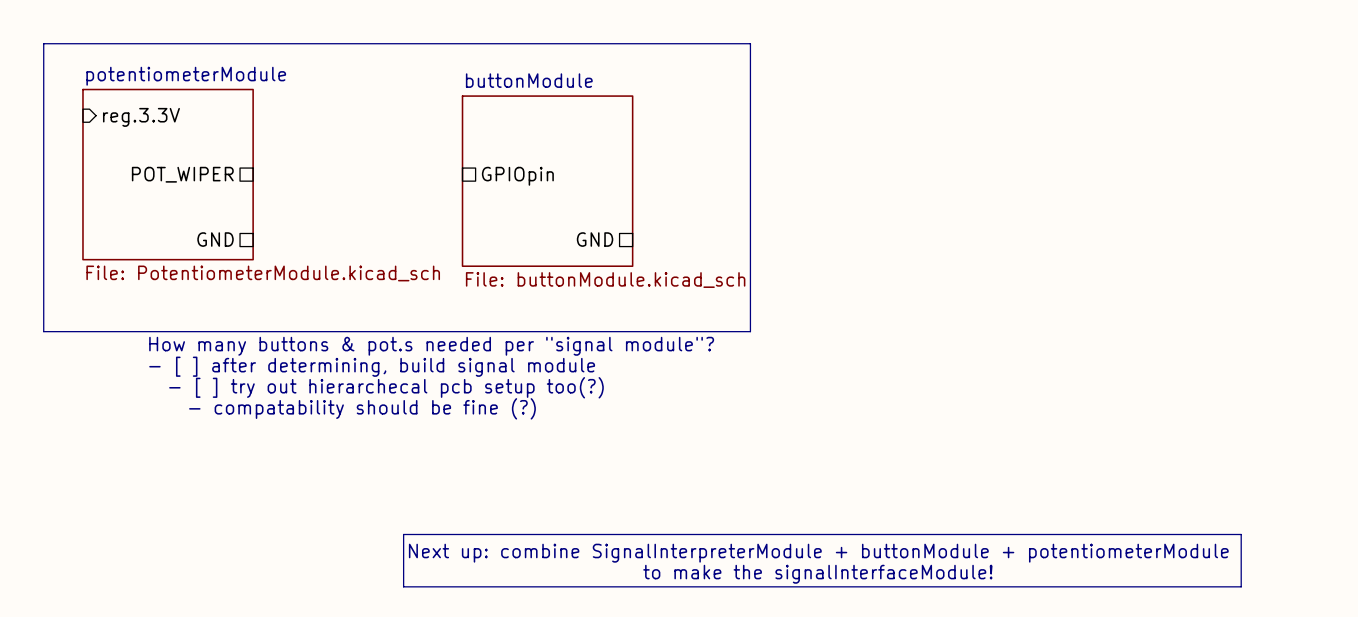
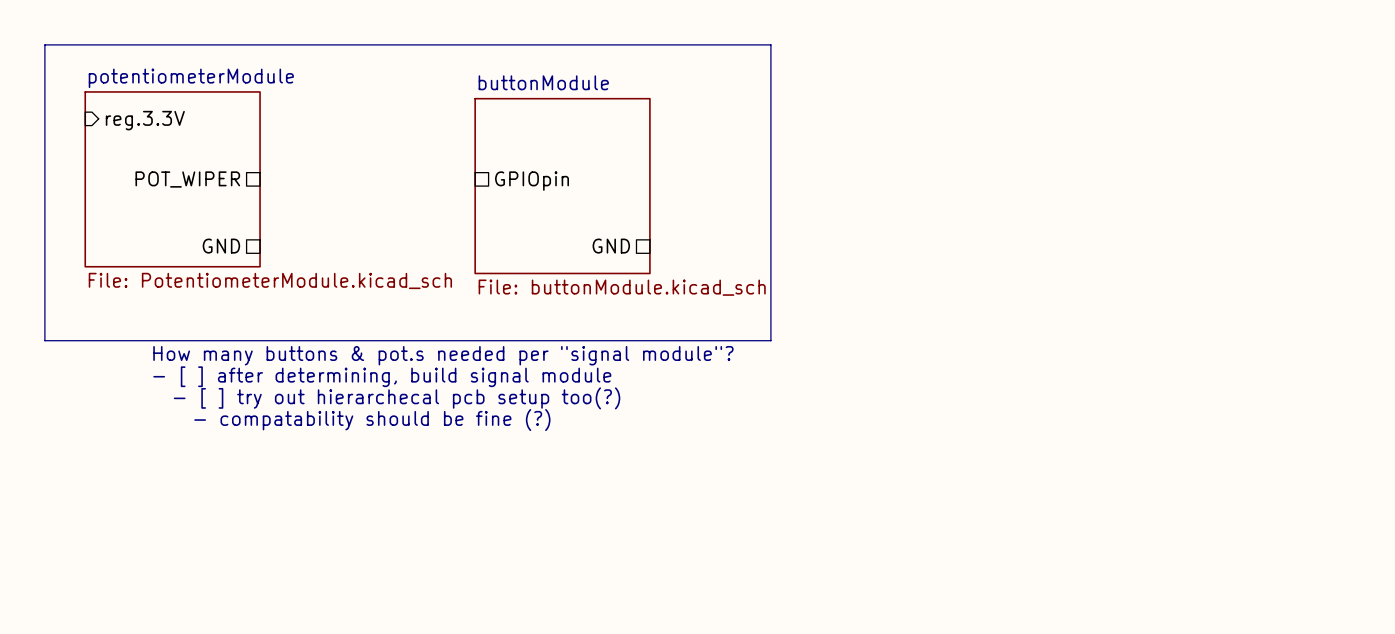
line: (403, 534) (1241, 534) (1241, 586) (403, 586) (403, 534) -> none
text: Next up: combine SignalInterpreterModule + buttonModule + potentiometerModule (818, 553) -> none
text: to make the signalInterfaceModule! (817, 574) -> none

